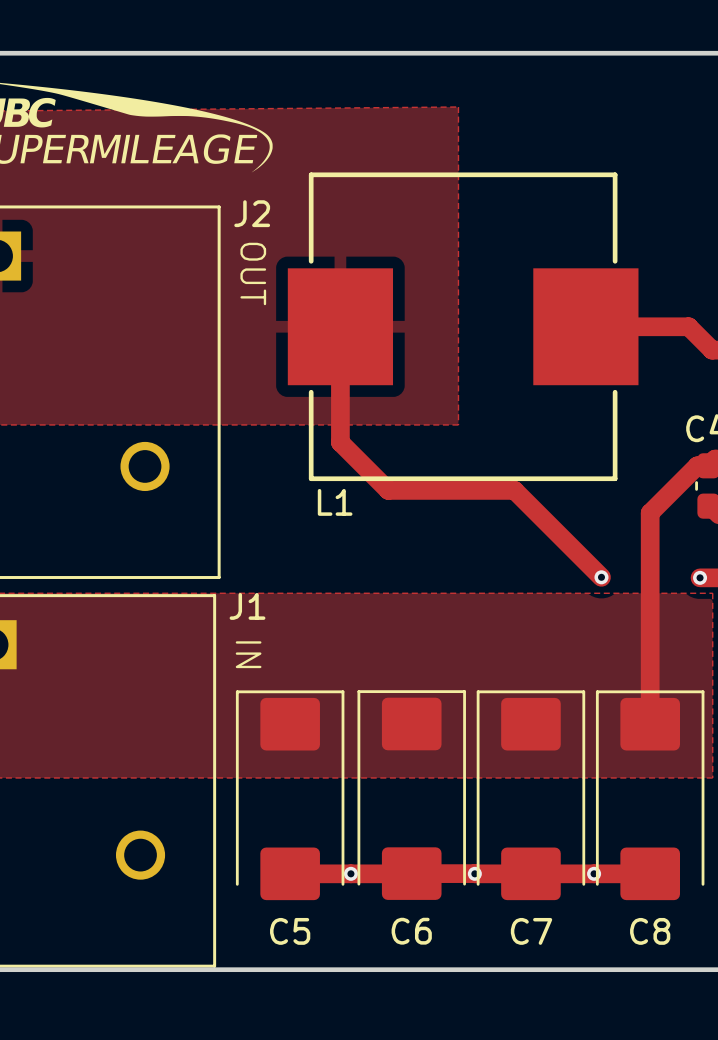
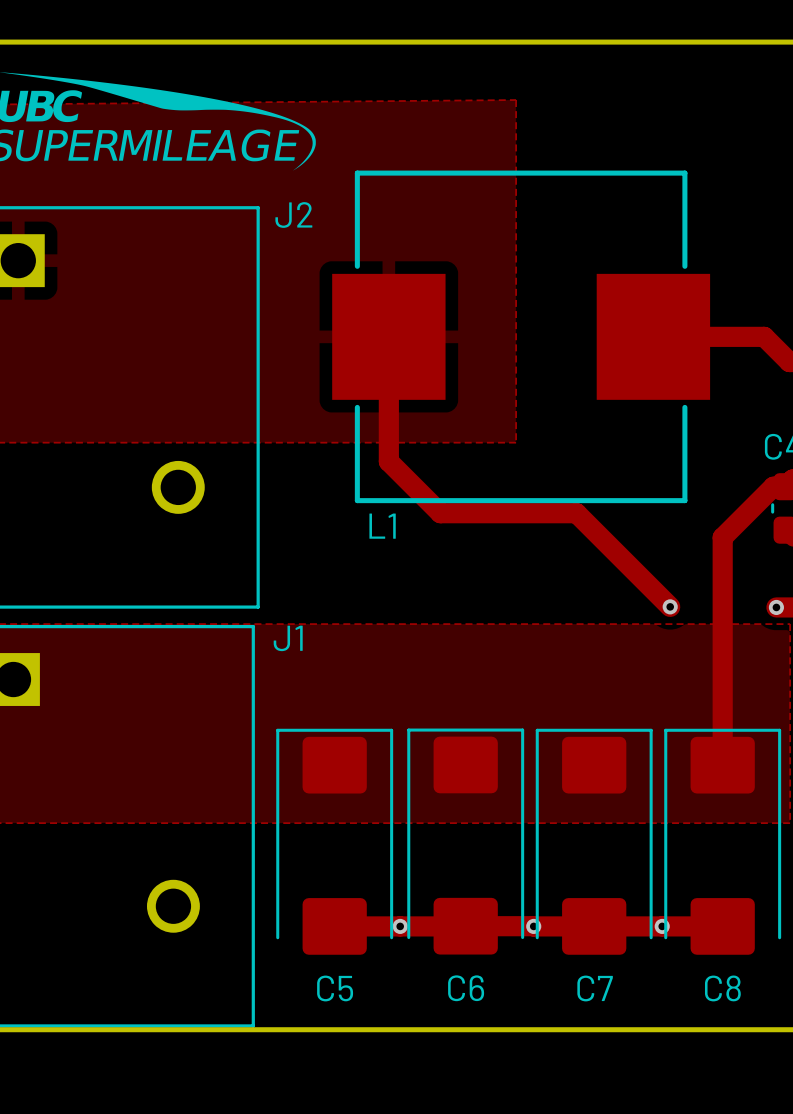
text: OUT (253, 273) -> none
text: IN (248, 654) -> none

